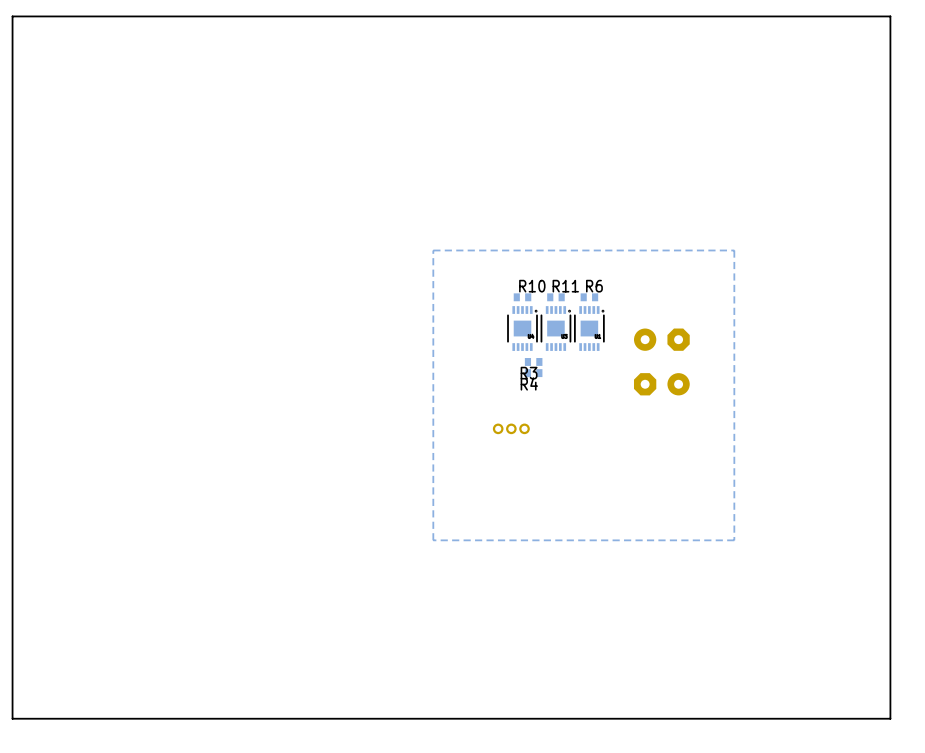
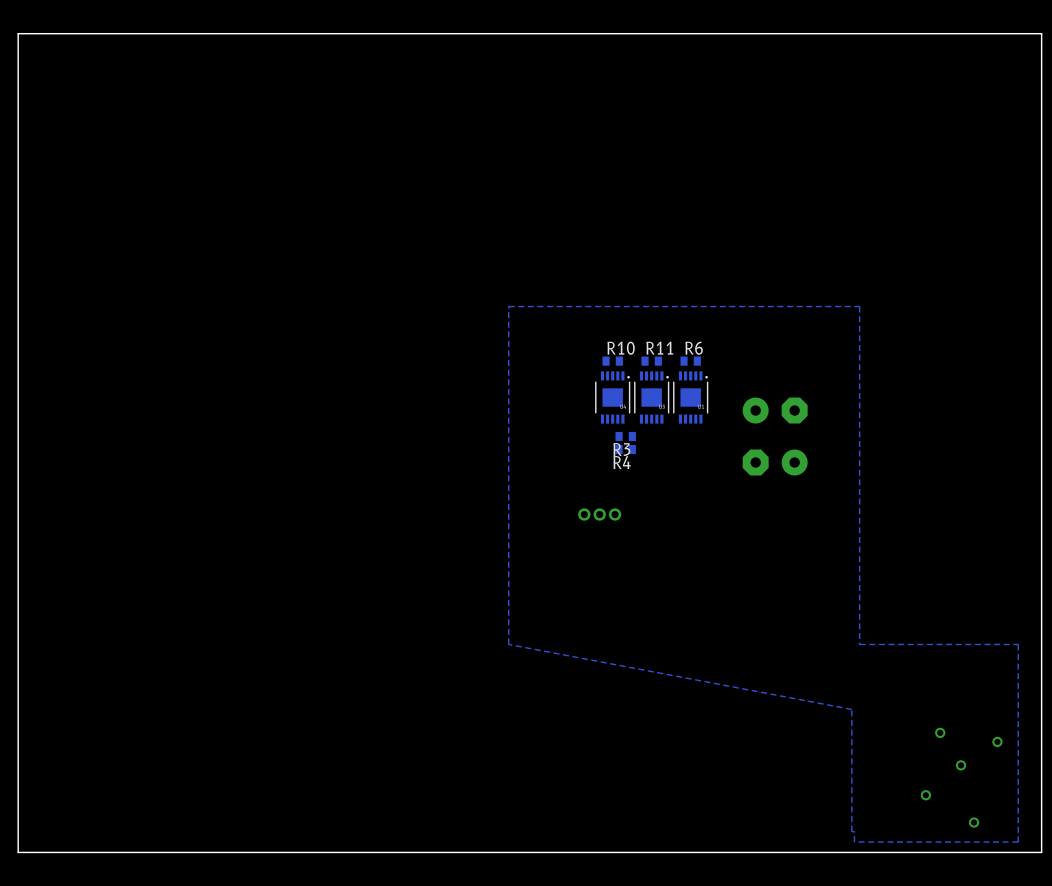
zone outline: (734, 540) (433, 540) -> (859, 644) (1018, 644) (1018, 842) (854, 842) (854, 831) (851, 831) (851, 709) (508, 644)
via: none -> (940, 732)
via: none -> (997, 741)
via: none -> (961, 765)
via: none -> (925, 795)
via: none -> (974, 822)

